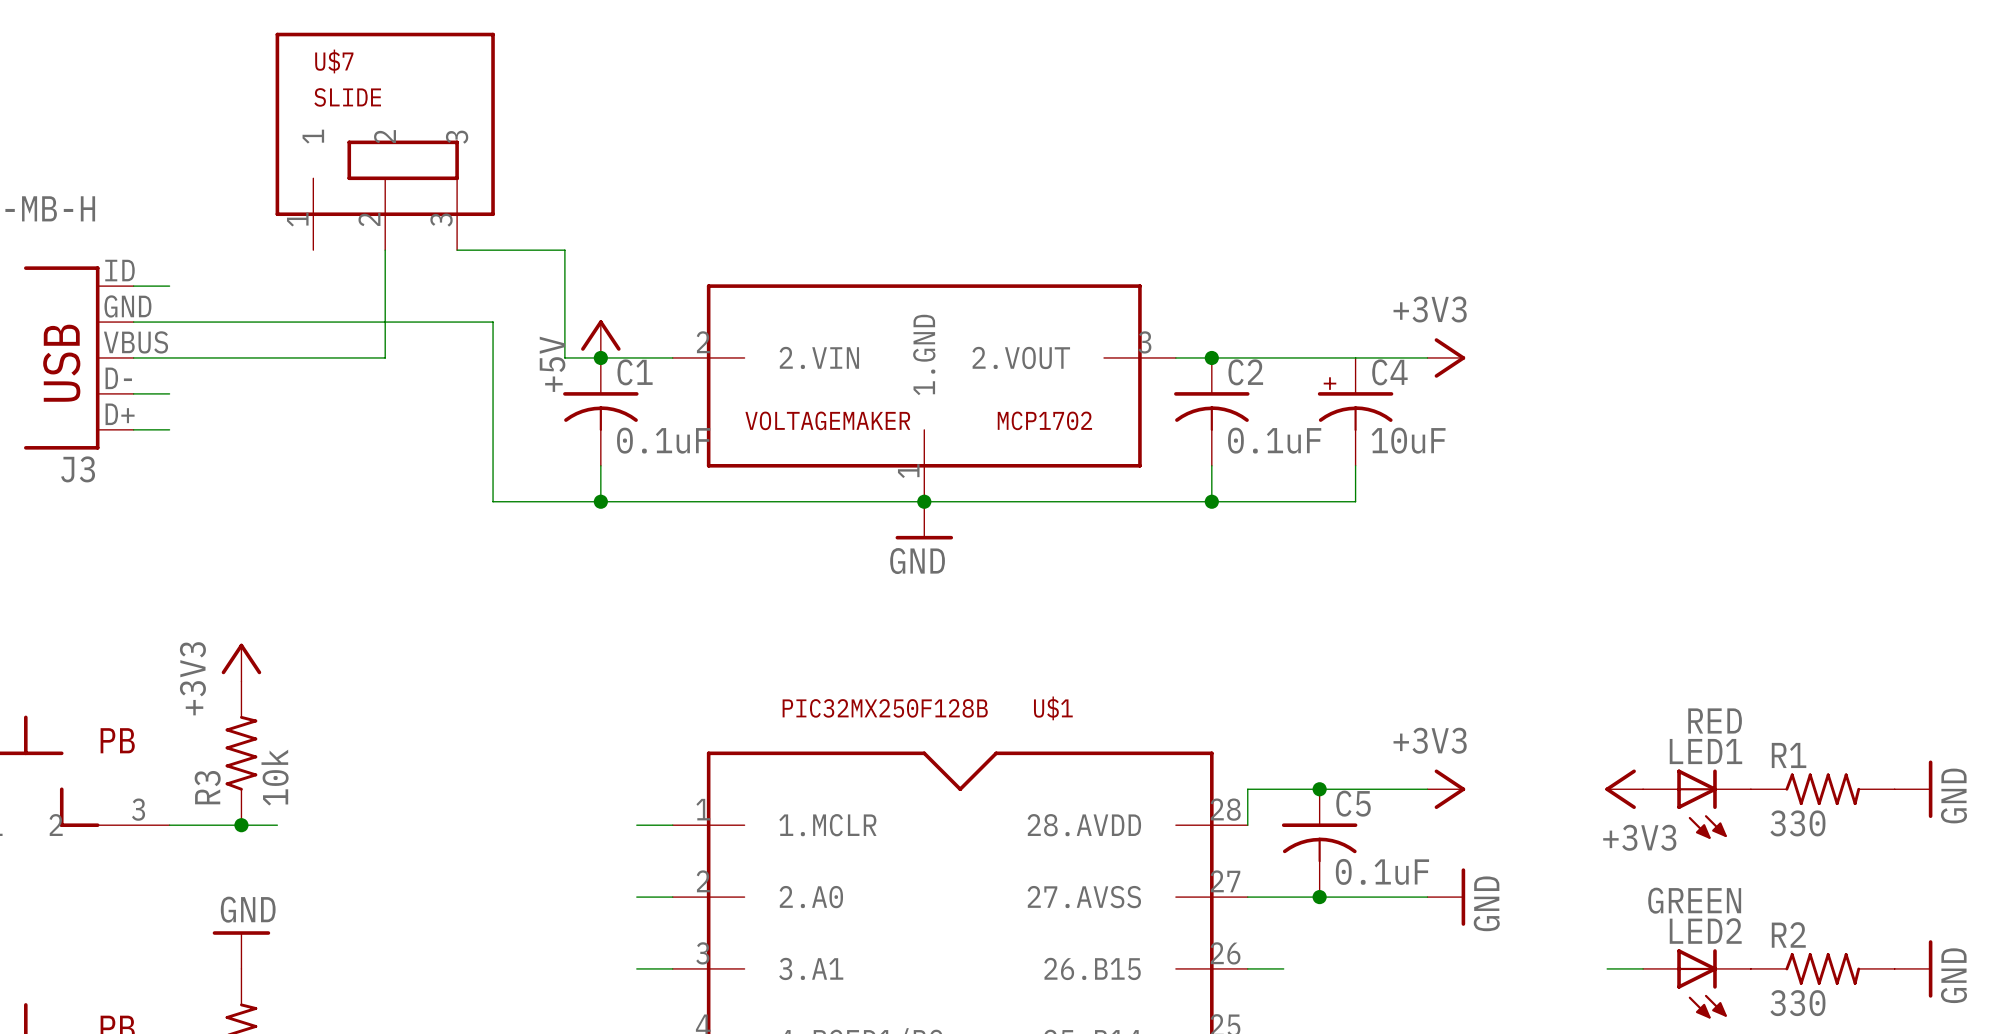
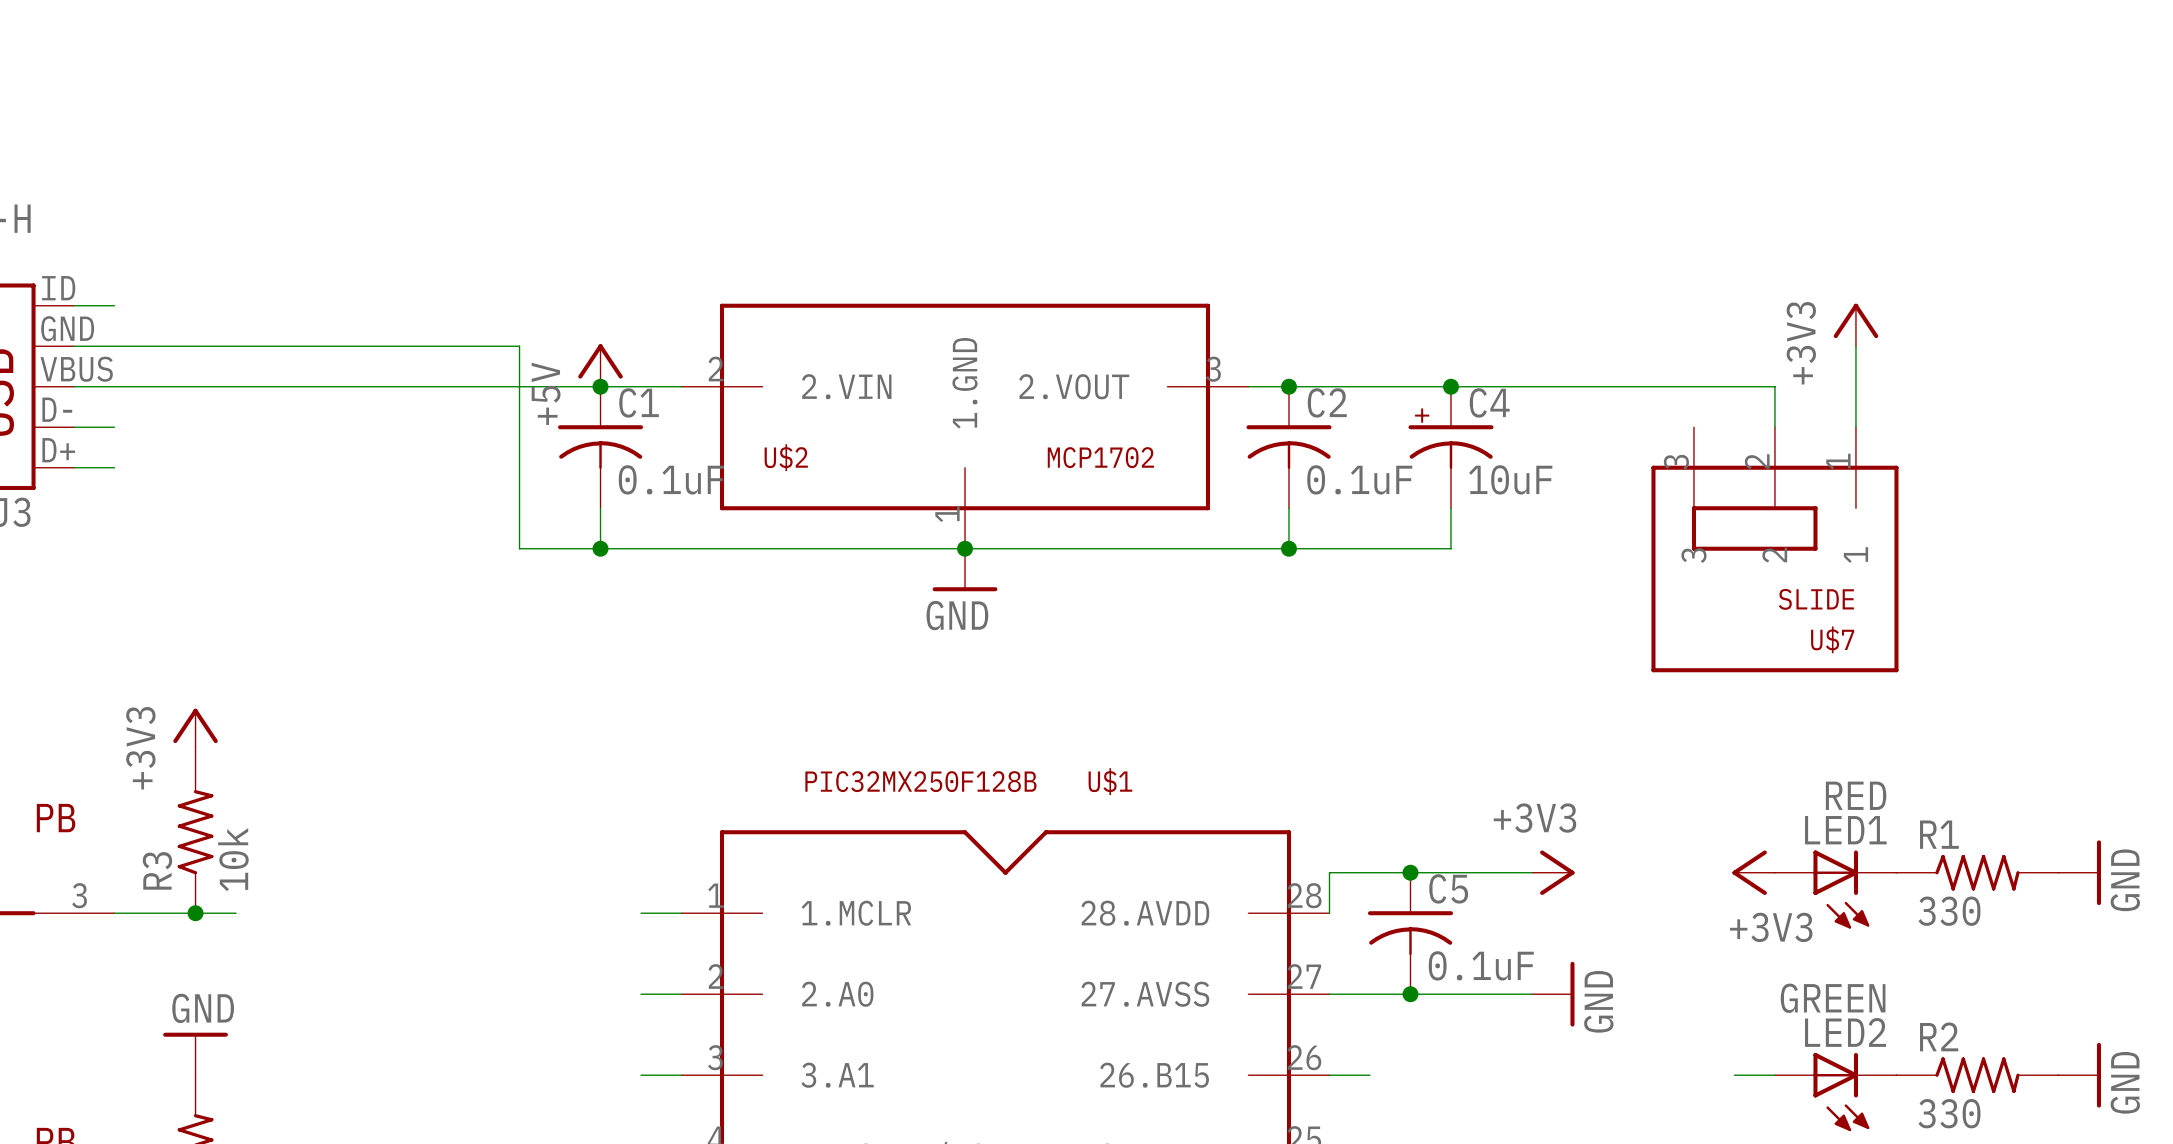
U$7 rotation: 0° (385, 124) -> 180° (1774, 568)
U$7 position: (385, 141) -> (1774, 549)
wire: (385, 250) (385, 357) -> none
wire: (457, 250) (564, 250) (564, 357) -> (357, 386) (560, 386)
wire: (493, 322) (493, 501) (528, 501) -> (479, 346) (519, 346) (519, 548)
wire: none -> (1855, 346) (1855, 427)
junction: none -> (1450, 386)
wire: none -> (1531, 386) (1774, 386) (1774, 427)
power symbol position: +3V3 (1446, 357) -> +3V3 (1855, 324)
power symbol rotation: 0° (1449, 357) -> 90° counterclockwise (1855, 320)
VOLTAGEMAKER name: VOLTAGEMAKER (827, 420) -> U$2 (786, 457)

